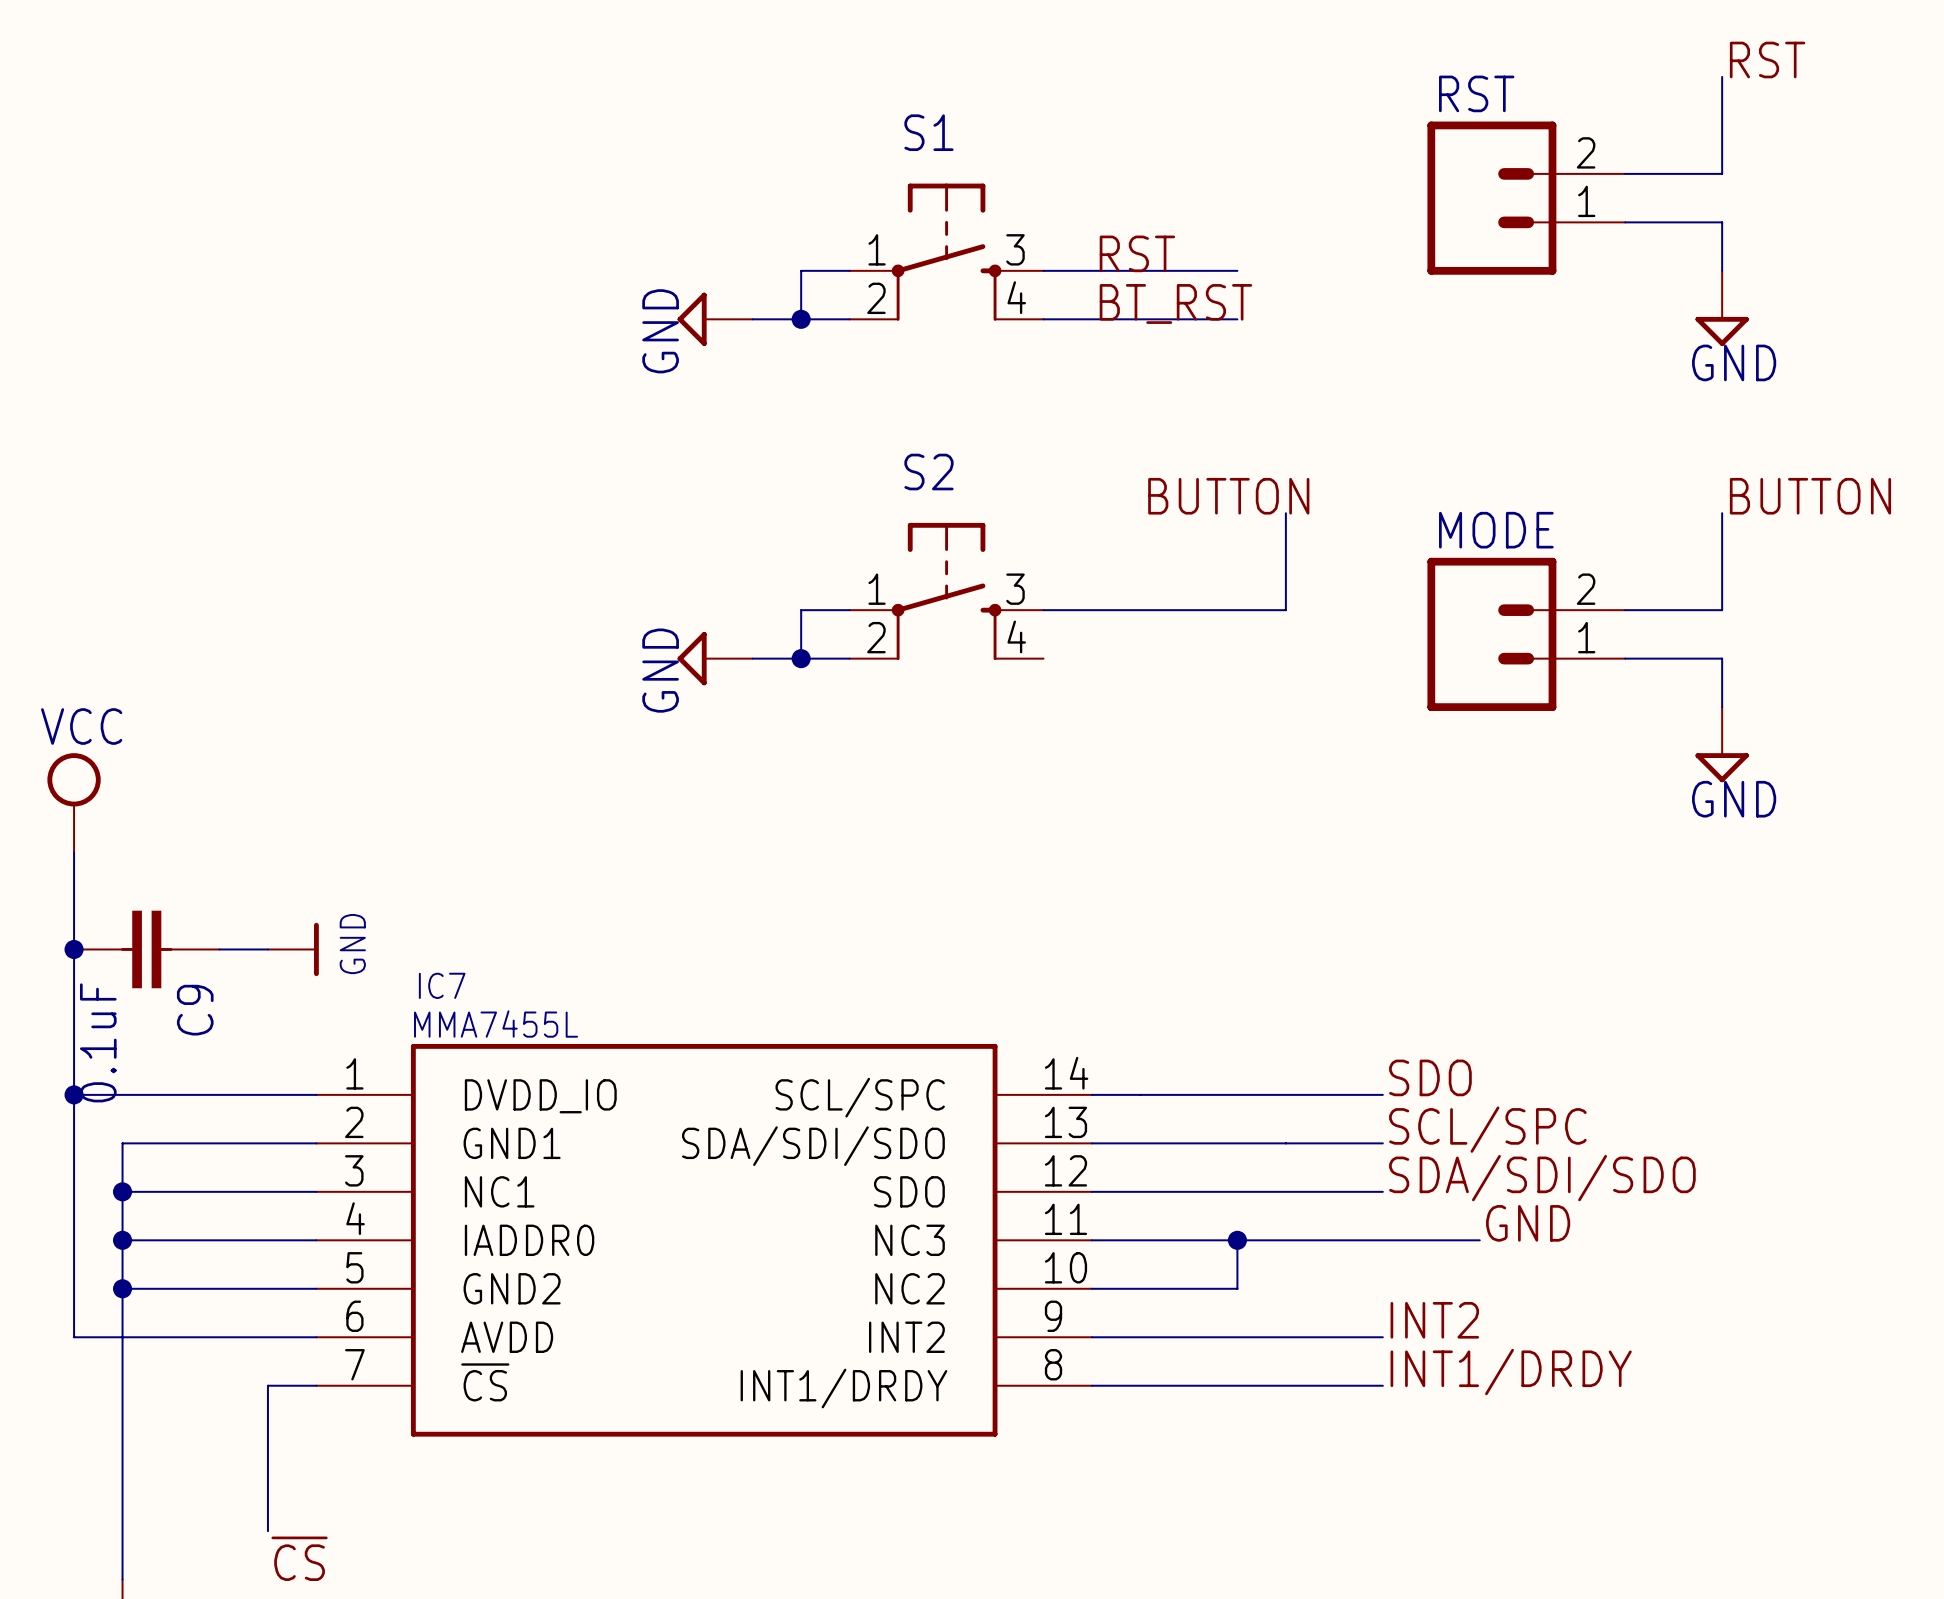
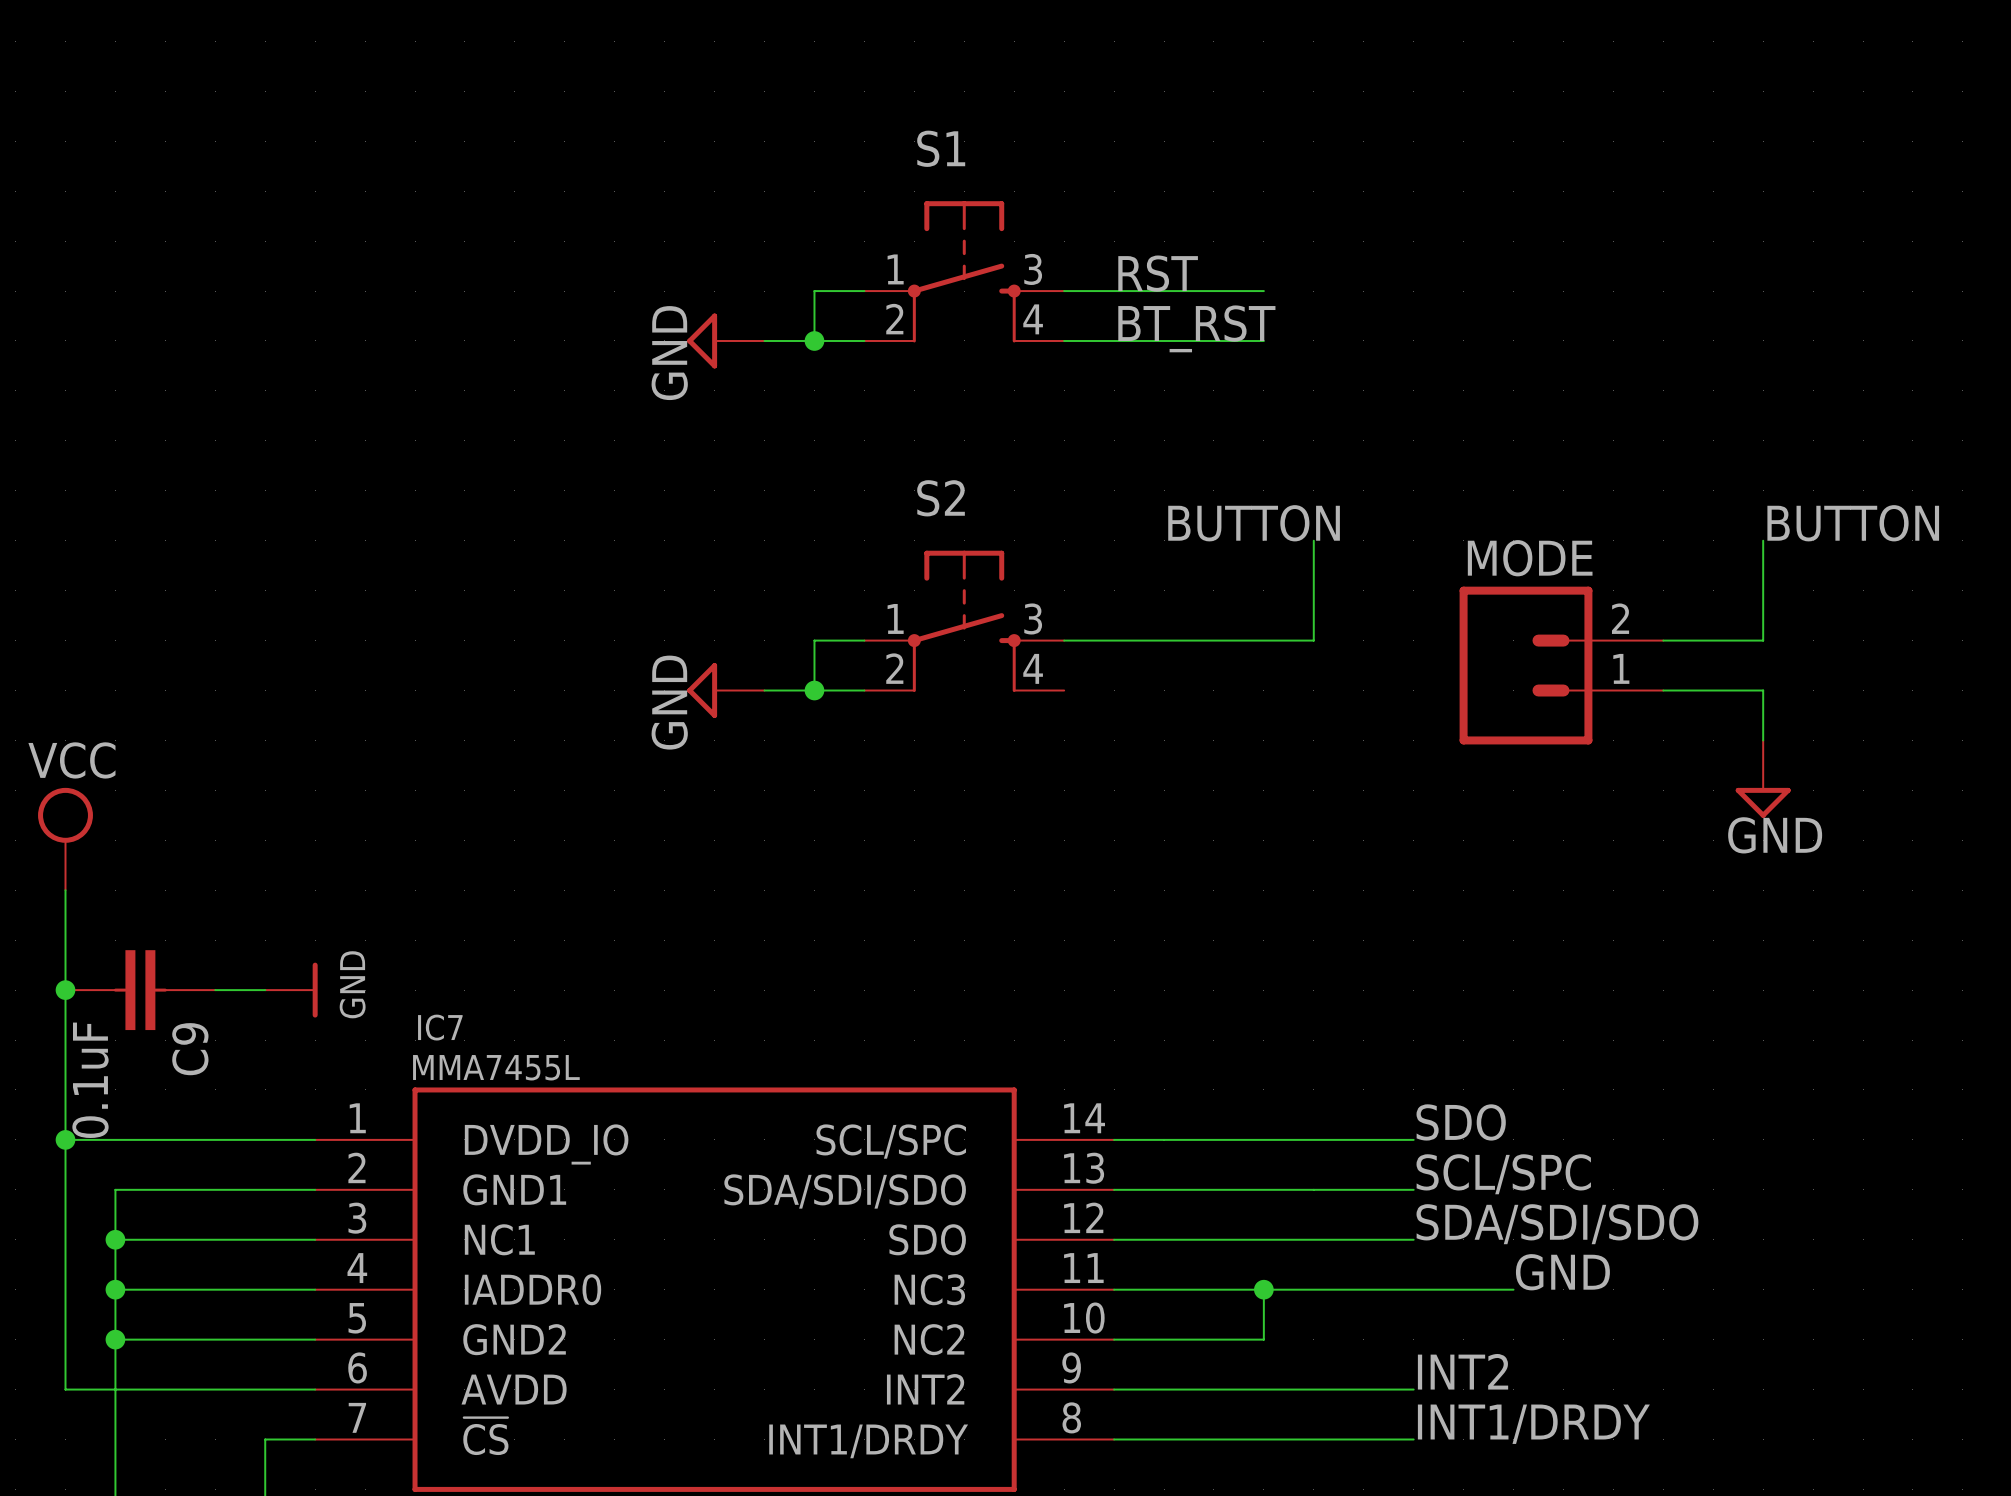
label: RST (1767, 59) -> none
wire: (1722, 76) (1722, 173) (1625, 173) -> none
RST: (1526, 198) -> none
wire: (1625, 222) (1722, 222) (1722, 270) -> none
power symbol: GND (1722, 308) -> none

